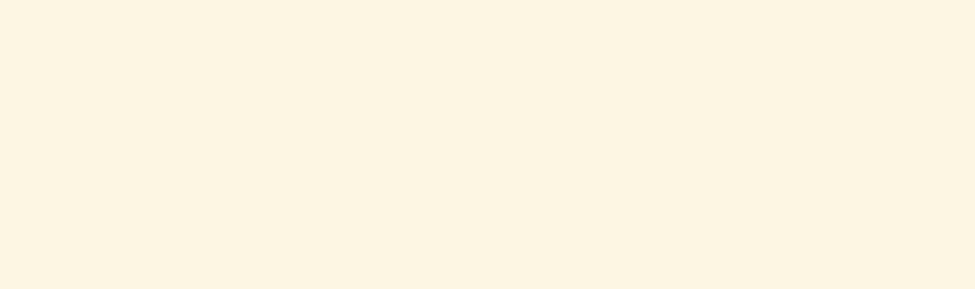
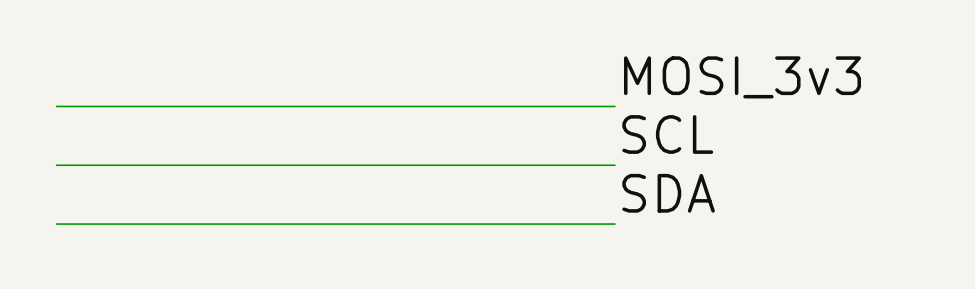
label: none -> MOSI_3v3 (742, 77)
wire: none -> (56, 106) (615, 106)
label: none -> SCL (667, 134)
wire: none -> (56, 165) (615, 165)
label: none -> SDA (668, 193)
wire: none -> (56, 224) (615, 224)

